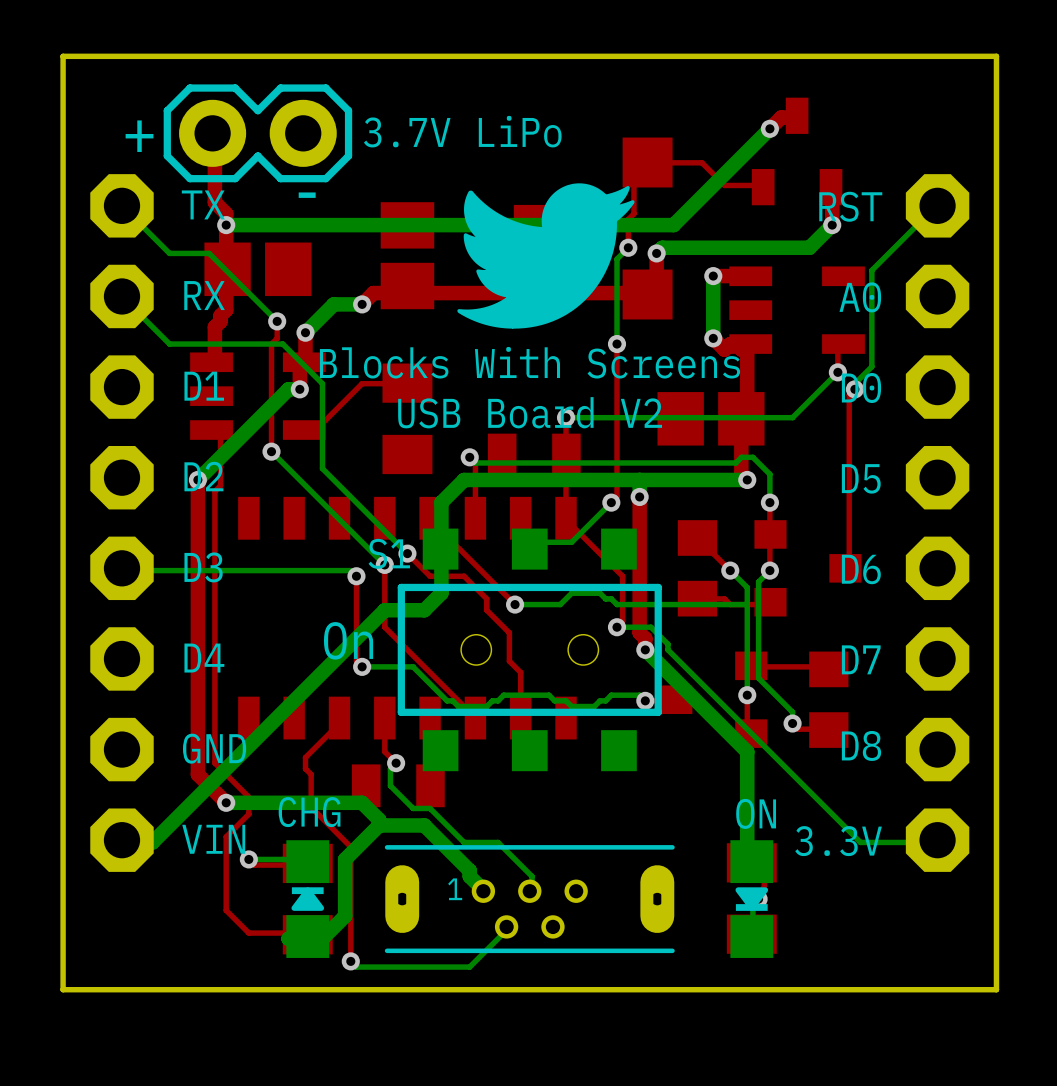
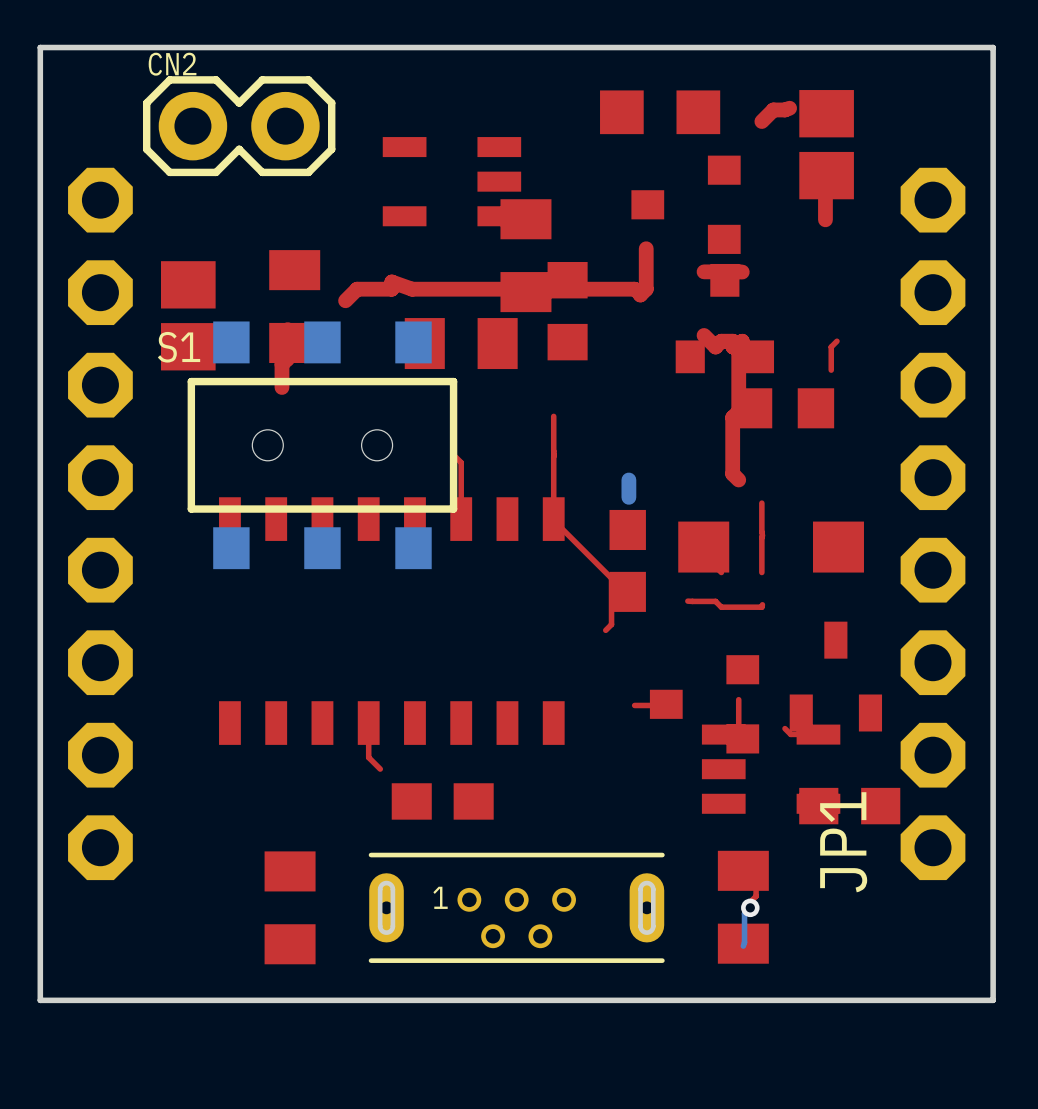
CN2 name: none -> CN2 (172, 64)
bottom track: (769, 128) (673, 225) (226, 225) -> none
via: (769, 128) -> none
text: 3.7V LiPo (462, 131) -> none
top track: (212, 133) (214, 134) (214, 202) (226, 213) (227, 269) (226, 310) (220, 315) (220, 321) (214, 327) (214, 361) (211, 362) -> none
text: + (139, 136) -> none
part: (797, 151) -> none
part: none -> (826, 144)
drawing: [457, 183, 635, 329] -> none
part: none -> (451, 181)
top track: (763, 187) (724, 185) (701, 162) (633, 162) (633, 213) (628, 219) (628, 247) -> none
text: - (307, 195) -> none
text: TX (203, 204) -> none
bottom track: (121, 205) (124, 208) (129, 208) (129, 213) (169, 253) (209, 253) (277, 321) -> none
bottom track: (937, 205) (928, 208) (928, 213) (871, 270) (871, 366) (854, 383) (854, 389) -> none
text: RST (850, 206) -> none
part: none -> (686, 204)
via: (226, 225) -> none
bottom track: (832, 225) (809, 247) (662, 247) (656, 253) -> none
via: (832, 225) -> none
part rotation: 0° (647, 228) -> 90° clockwise (771, 547)
part position: (647, 228) -> (771, 547)
bottom track: (628, 247) (617, 259) (617, 344) -> none
via: (628, 247) -> none
via: (656, 253) -> none
part: (407, 255) -> none
part rotation: 0° (257, 269) -> 90° clockwise (188, 315)
part position: (257, 269) -> (188, 315)
bottom track: (713, 276) (713, 338) -> none
via: (713, 276) -> none
text: RX (204, 295) -> none
bottom track: (121, 296) (124, 298) (129, 298) (129, 304) (169, 344) (282, 344) (322, 383) (322, 468) (407, 553) -> none
text: A0 (860, 297) -> none
bottom track: (362, 304) (333, 304) (305, 332) -> none
via: (362, 304) -> none
part: none -> (294, 306)
part: (797, 310) -> none
part: none -> (567, 311)
top track: (277, 321) (277, 338) (271, 344) (271, 451) -> none
via: (277, 321) -> none
part: none -> (724, 318)
via: (305, 332) -> none
via: (713, 338) -> none
top track: (617, 344) (617, 496) (611, 502) -> none
via: (617, 344) -> none
part: none -> (461, 343)
text: Blocks With Screens (530, 362) -> none
bottom track: (837, 372) (792, 417) (566, 417) -> none
via: (837, 372) -> none
top track: (407, 383) (362, 383) (322, 423) (322, 429) (304, 430) -> none
text: D1 (204, 386) -> none
text: D0 (861, 387) -> none
bottom track: (299, 389) (288, 389) (197, 479) -> none
via: (299, 389) -> none
top track: (854, 389) (849, 395) (849, 564) (845, 568) -> none
via: (854, 389) -> none
part: (257, 396) -> none
part: none -> (784, 408)
text: USB Board V2 (530, 412) -> none
via: (566, 417) -> none
part: (407, 418) -> none
part: (711, 418) -> none
top track: (211, 430) (220, 429) (220, 485) (214, 491) (214, 763) (248, 797) (248, 814) (226, 836) (226, 910) (248, 933) (306, 933) (307, 934) -> none
bottom track: (271, 451) (384, 564) -> none
via: (271, 451) -> none
part: (534, 455) -> none
bottom track: (469, 457) (475, 462) (735, 462) (741, 457) (752, 457) (769, 474) (769, 502) -> none
via: (469, 457) -> none
text: D2 (203, 476) -> none
text: D5 (861, 478) -> none
top track: (197, 479) (197, 774) (226, 802) -> none
via: (197, 479) -> none
bottom track: (747, 479) (464, 479) (441, 502) (441, 593) (424, 610) (384, 610) (152, 842) (124, 842) (121, 840) -> none
via: (747, 479) -> none
top track: (639, 496) (639, 632) (645, 638) (645, 649) -> none
via: (639, 496) -> none
bottom track: (611, 502) (571, 542) (532, 542) (532, 547) (529, 549) -> none
via: (611, 502) -> none
via: (769, 502) -> none
top track: (430, 518) (515, 604) -> none
top track: (407, 553) (430, 576) (464, 576) (486, 598) (486, 610) (509, 632) (509, 661) (520, 672) (520, 718) -> none
via: (407, 553) -> none
part: none -> (627, 560)
top track: (384, 564) (384, 627) (475, 717) -> none
via: (384, 564) -> none
text: D3 (203, 567) -> none
bottom track: (121, 568) (124, 570) (350, 570) (356, 576) -> none
part: (697, 568) -> none
part: (807, 568) -> none
text: D6 (861, 569) -> none
bottom track: (730, 570) (747, 587) (747, 695) -> none
via: (730, 570) -> none
bottom track: (769, 570) (758, 581) (758, 678) (792, 712) (792, 723) -> none
via: (769, 570) -> none
top track: (356, 576) (356, 661) (362, 666) -> none
via: (356, 576) -> none
via: (515, 604) -> none
bottom track: (747, 604) (617, 604) (611, 598) (605, 598) (600, 593) (571, 593) (560, 604) (515, 604) -> none
bottom track: (617, 627) (650, 627) (667, 644) (667, 649) (860, 842) (934, 842) (937, 840) -> none
via: (617, 627) -> none
text: On (348, 640) -> none
S1 position: (529, 649) -> (322, 445)
bottom track: (645, 649) (747, 751) (747, 859) (751, 861) -> none
via: (645, 649) -> none
part footprint: [809, 651, 849, 748] -> [789, 621, 883, 732]
text: D4 (204, 658) -> none
text: D7 (861, 659) -> none
top track: (751, 665) (826, 666) (828, 669) -> none
bottom track: (362, 666) (413, 666) (447, 700) (452, 700) (458, 706) (486, 706) (492, 700) (498, 700) (503, 695) (549, 695) (554, 700) (566, 700) (571, 706) (594, 706) (600, 700) (605, 700) (611, 695) (639, 695) (645, 700) -> none
via: (362, 666) -> none
via: (747, 695) -> none
via: (645, 700) -> none
top track: (339, 718) (339, 723) (305, 757) (305, 768) (311, 774) (311, 807) (350, 846) (350, 961) -> none
via: (792, 723) -> none
text: D8 (861, 745) -> none
text: GND (214, 748) -> none
bottom track: (396, 763) (390, 768) (390, 785) (413, 808) (430, 808) (464, 842) (498, 842) (532, 876) (532, 882) (537, 887) (537, 893) (532, 893) (529, 891) -> none
via: (396, 763) -> none
part: none -> (771, 769)
part: (398, 785) -> none
part: none -> (442, 801)
part: none -> (849, 806)
bottom track: (226, 802) (362, 802) (379, 819) (379, 825) -> none
via: (226, 802) -> none
bottom track: (379, 825) (345, 859) (345, 916) (322, 938) (288, 938) (307, 936) -> none
bottom track: (379, 825) (424, 825) (469, 870) (469, 876) (483, 891) -> none
JP1 name: none -> JP1 (843, 842)
text: VIN (213, 839) -> none
text: 3.3V (838, 841) -> none
bottom track: (248, 859) (307, 861) -> none
top track: (248, 859) (254, 865) (306, 865) (307, 863) -> none
via: (248, 859) -> none
CHG side: bottom (307, 899) -> top (660, 112)
ON: (751, 899) -> none
bottom track: (506, 926) (509, 927) (469, 967) (356, 967) (350, 961) -> none
via: (350, 961) -> none

